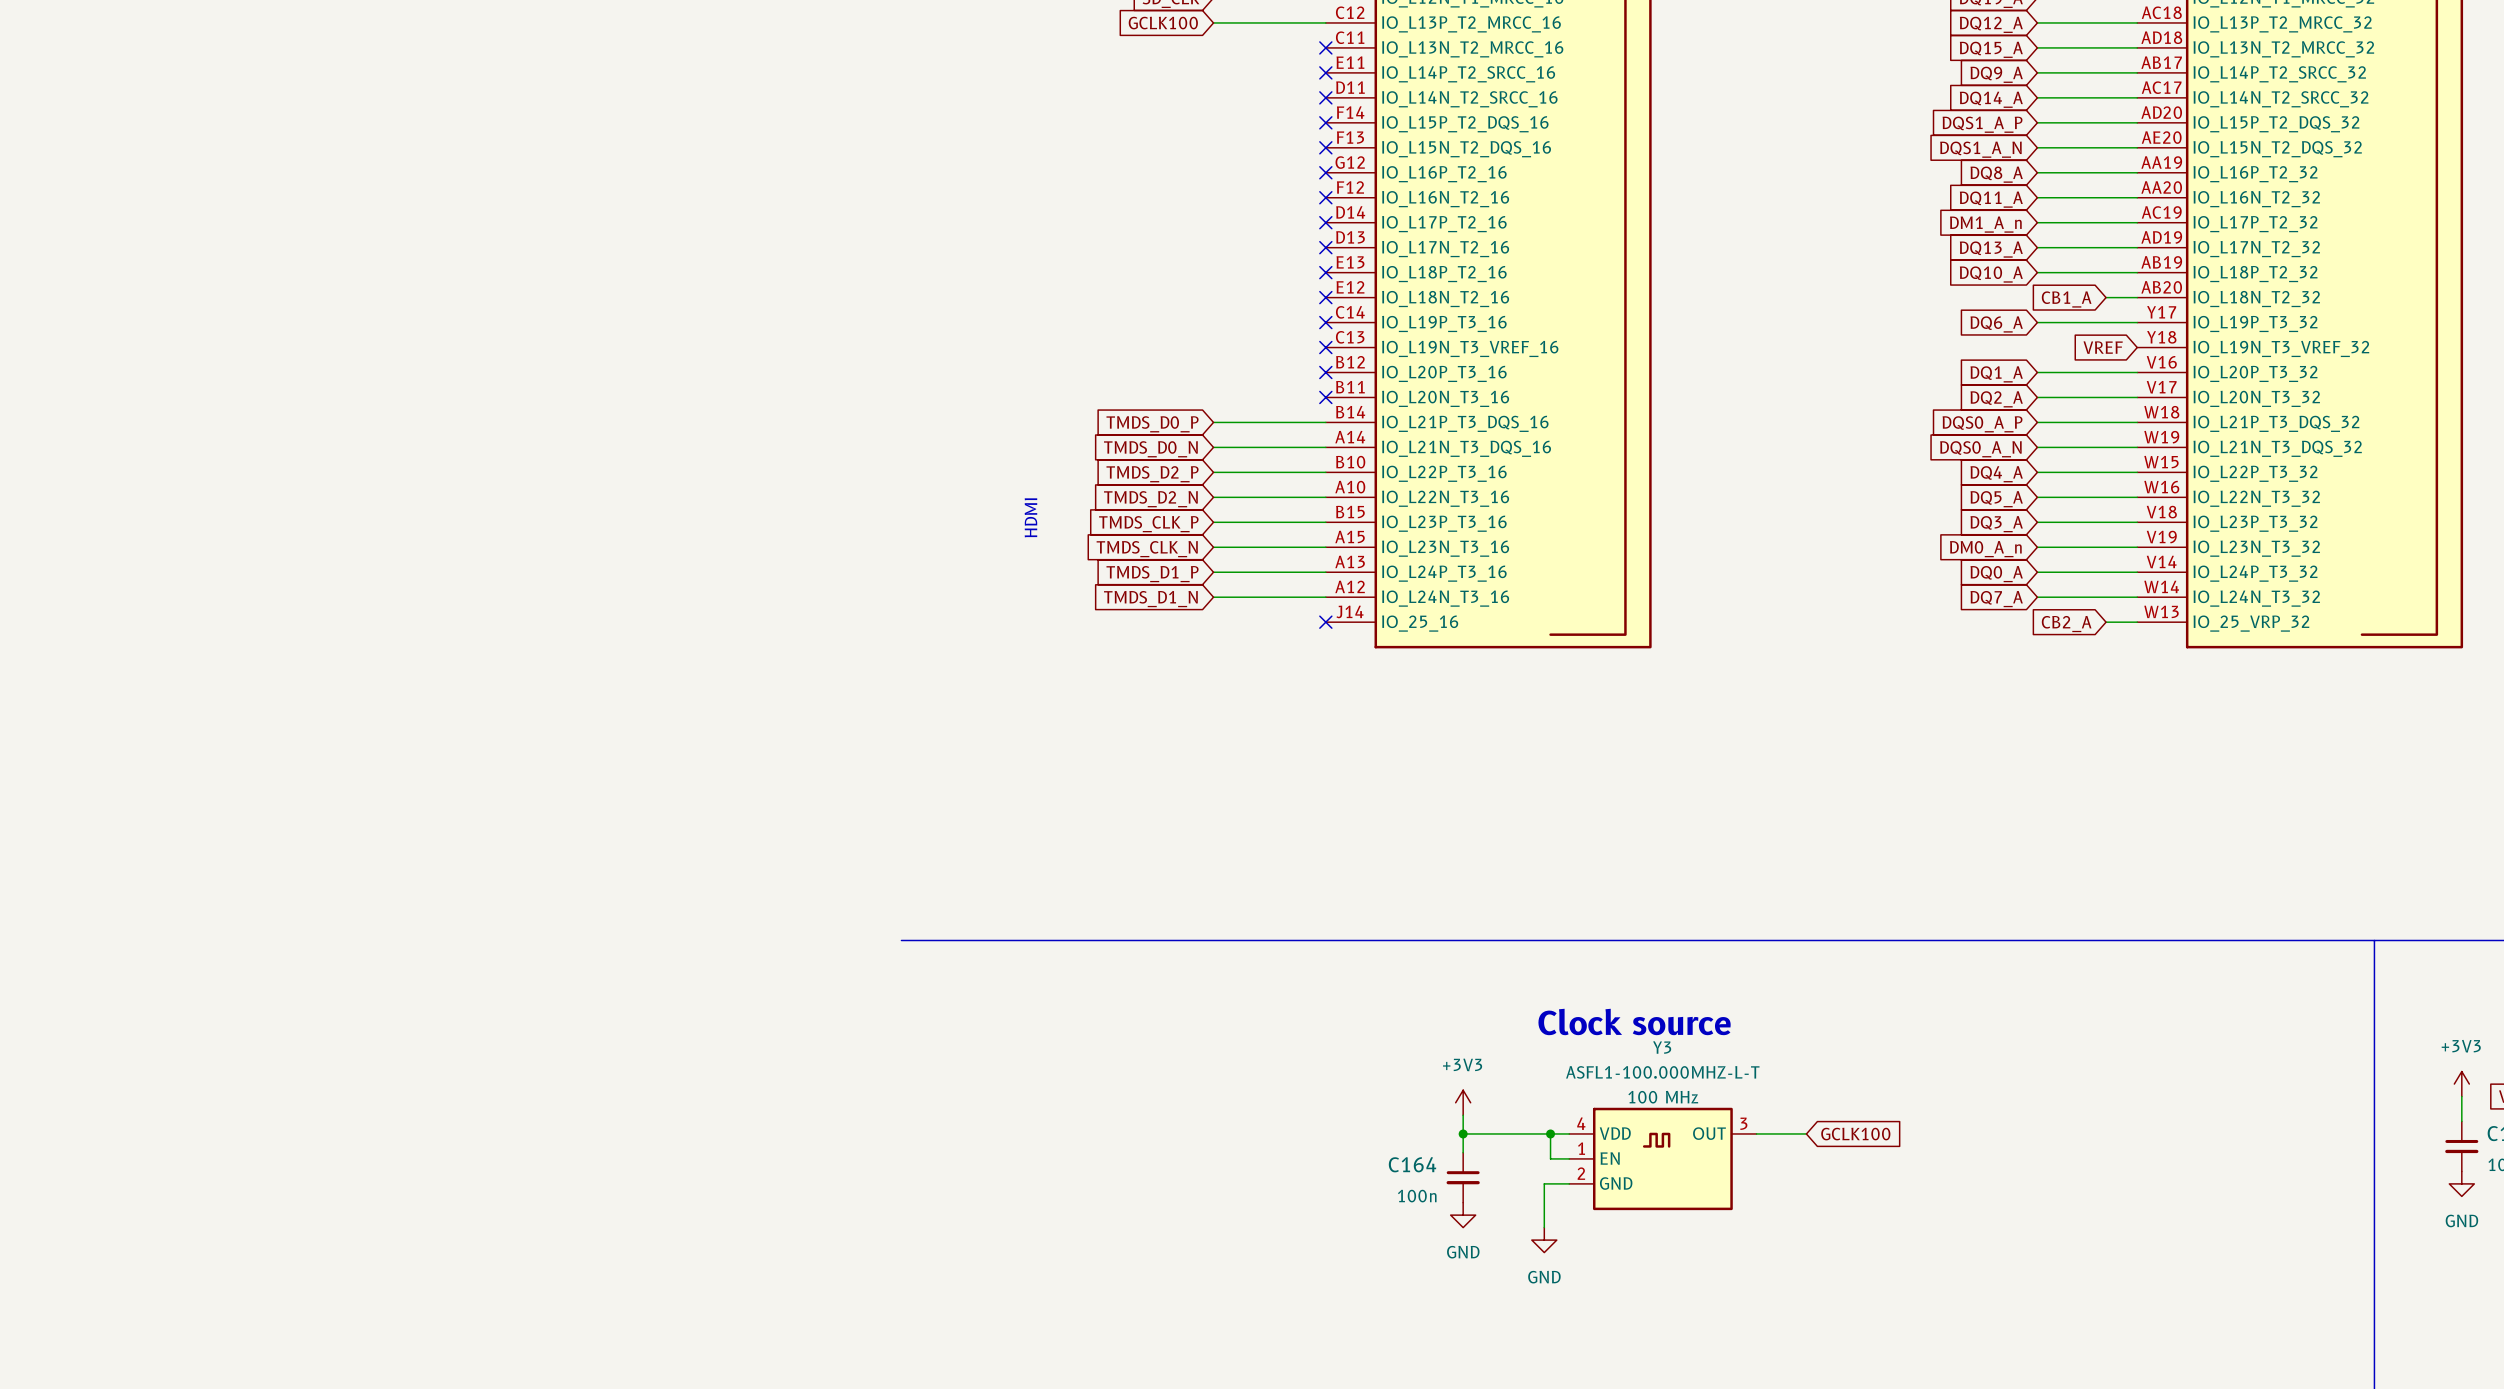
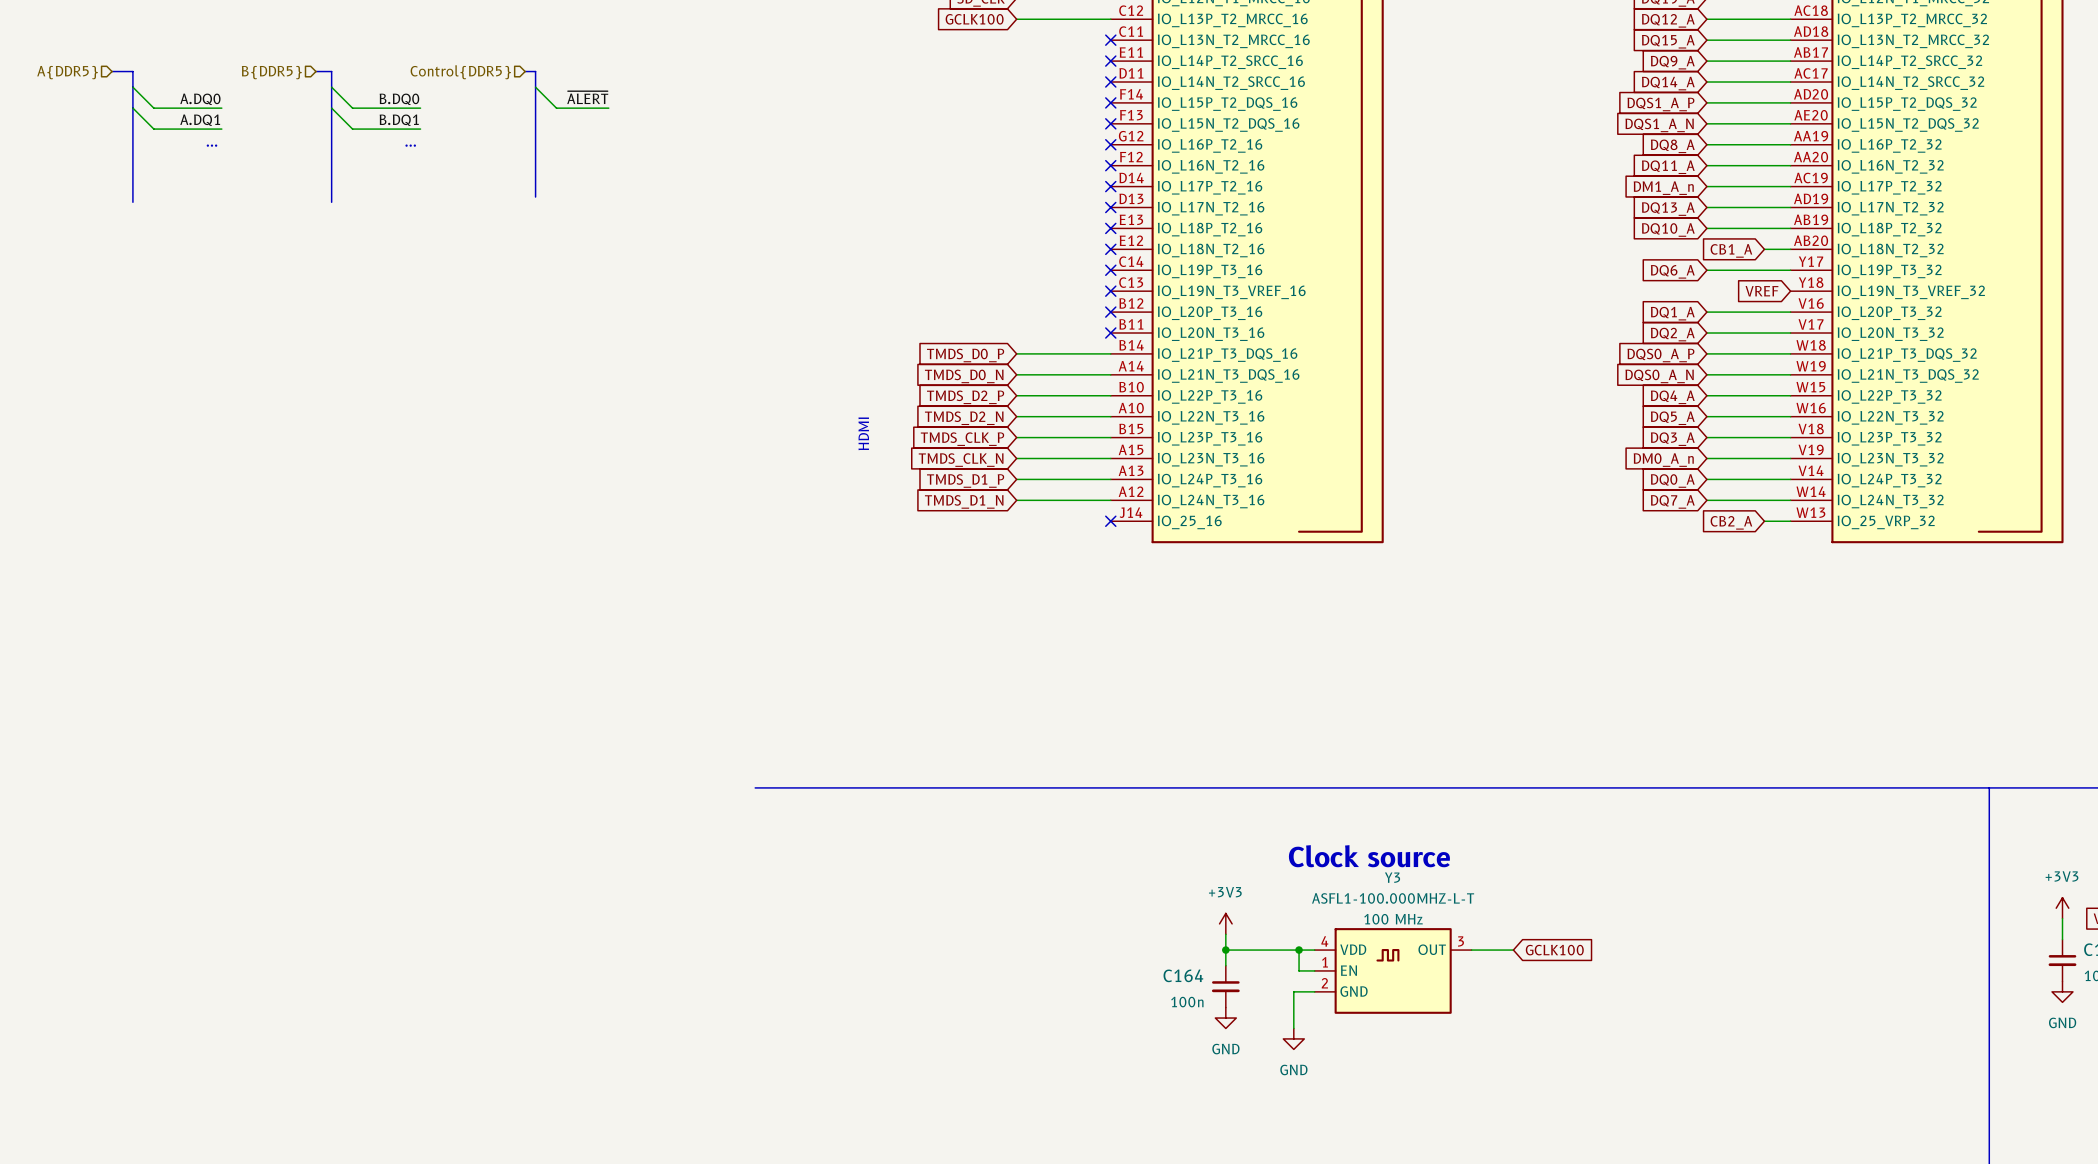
bus: none -> (112, 71) (132, 71) (132, 202)
bus: none -> (315, 71) (331, 71) (331, 202)
bus: none -> (525, 71) (535, 71) (535, 197)
hierarchical label: none -> A{DDR5} (67, 72)
hierarchical label: none -> B{DDR5} (271, 72)
hierarchical label: none -> Control{DDR5} (460, 72)
wire: none -> (132, 87) (153, 108) (221, 108)
wire: none -> (331, 87) (352, 108) (420, 108)
wire: none -> (535, 87) (556, 108) (608, 108)
label: none -> ~{ALERT} (587, 97)
label: none -> A.DQ0 (200, 99)
label: none -> B.DQ0 (399, 99)
wire: none -> (132, 108) (153, 129) (221, 129)
wire: none -> (331, 108) (352, 129) (420, 129)
label: none -> A.DQ1 (200, 120)
label: none -> B.DQ1 (399, 120)
text: none -> ... (211, 145)
text: none -> ... (410, 145)

